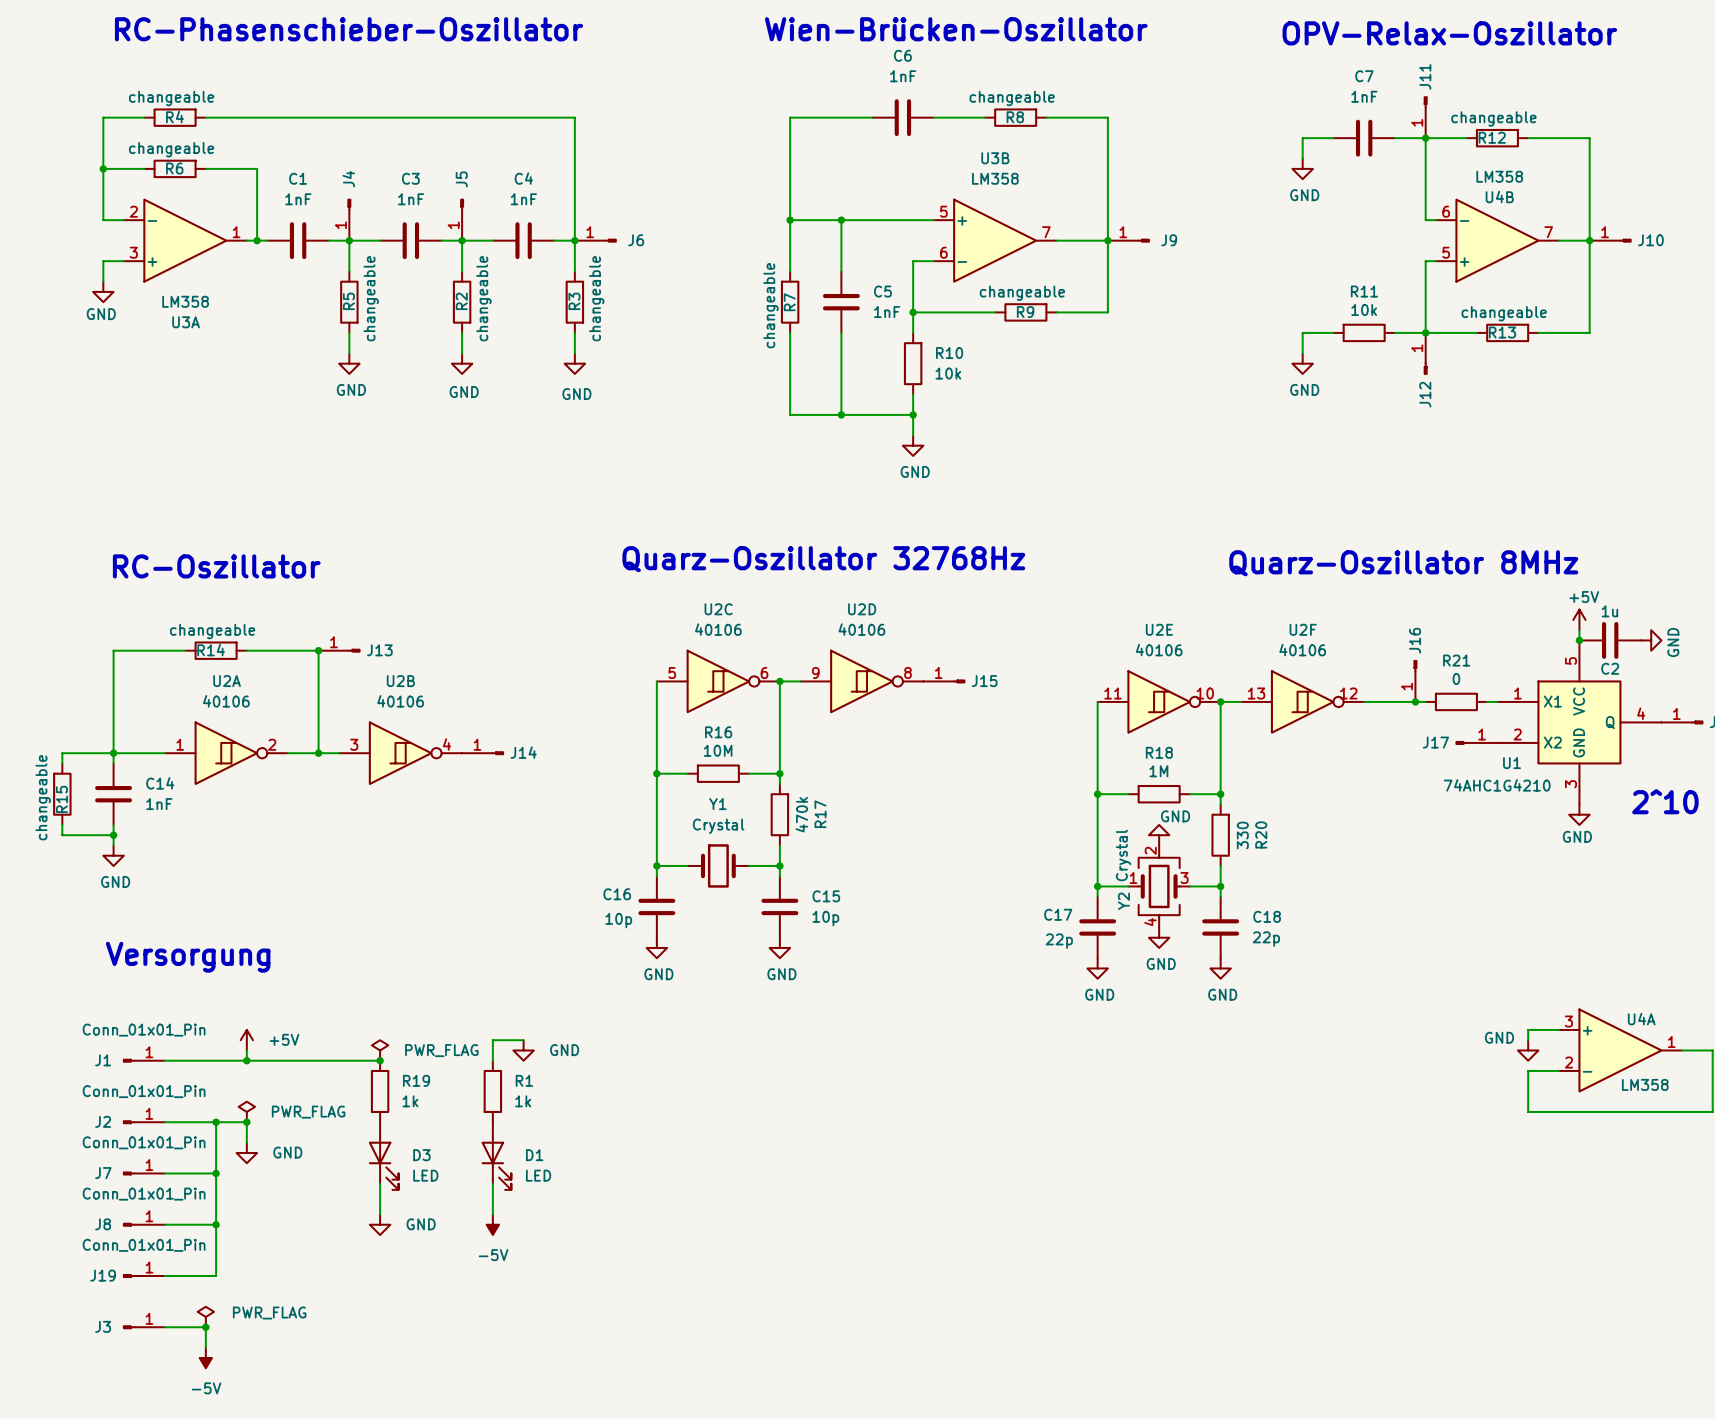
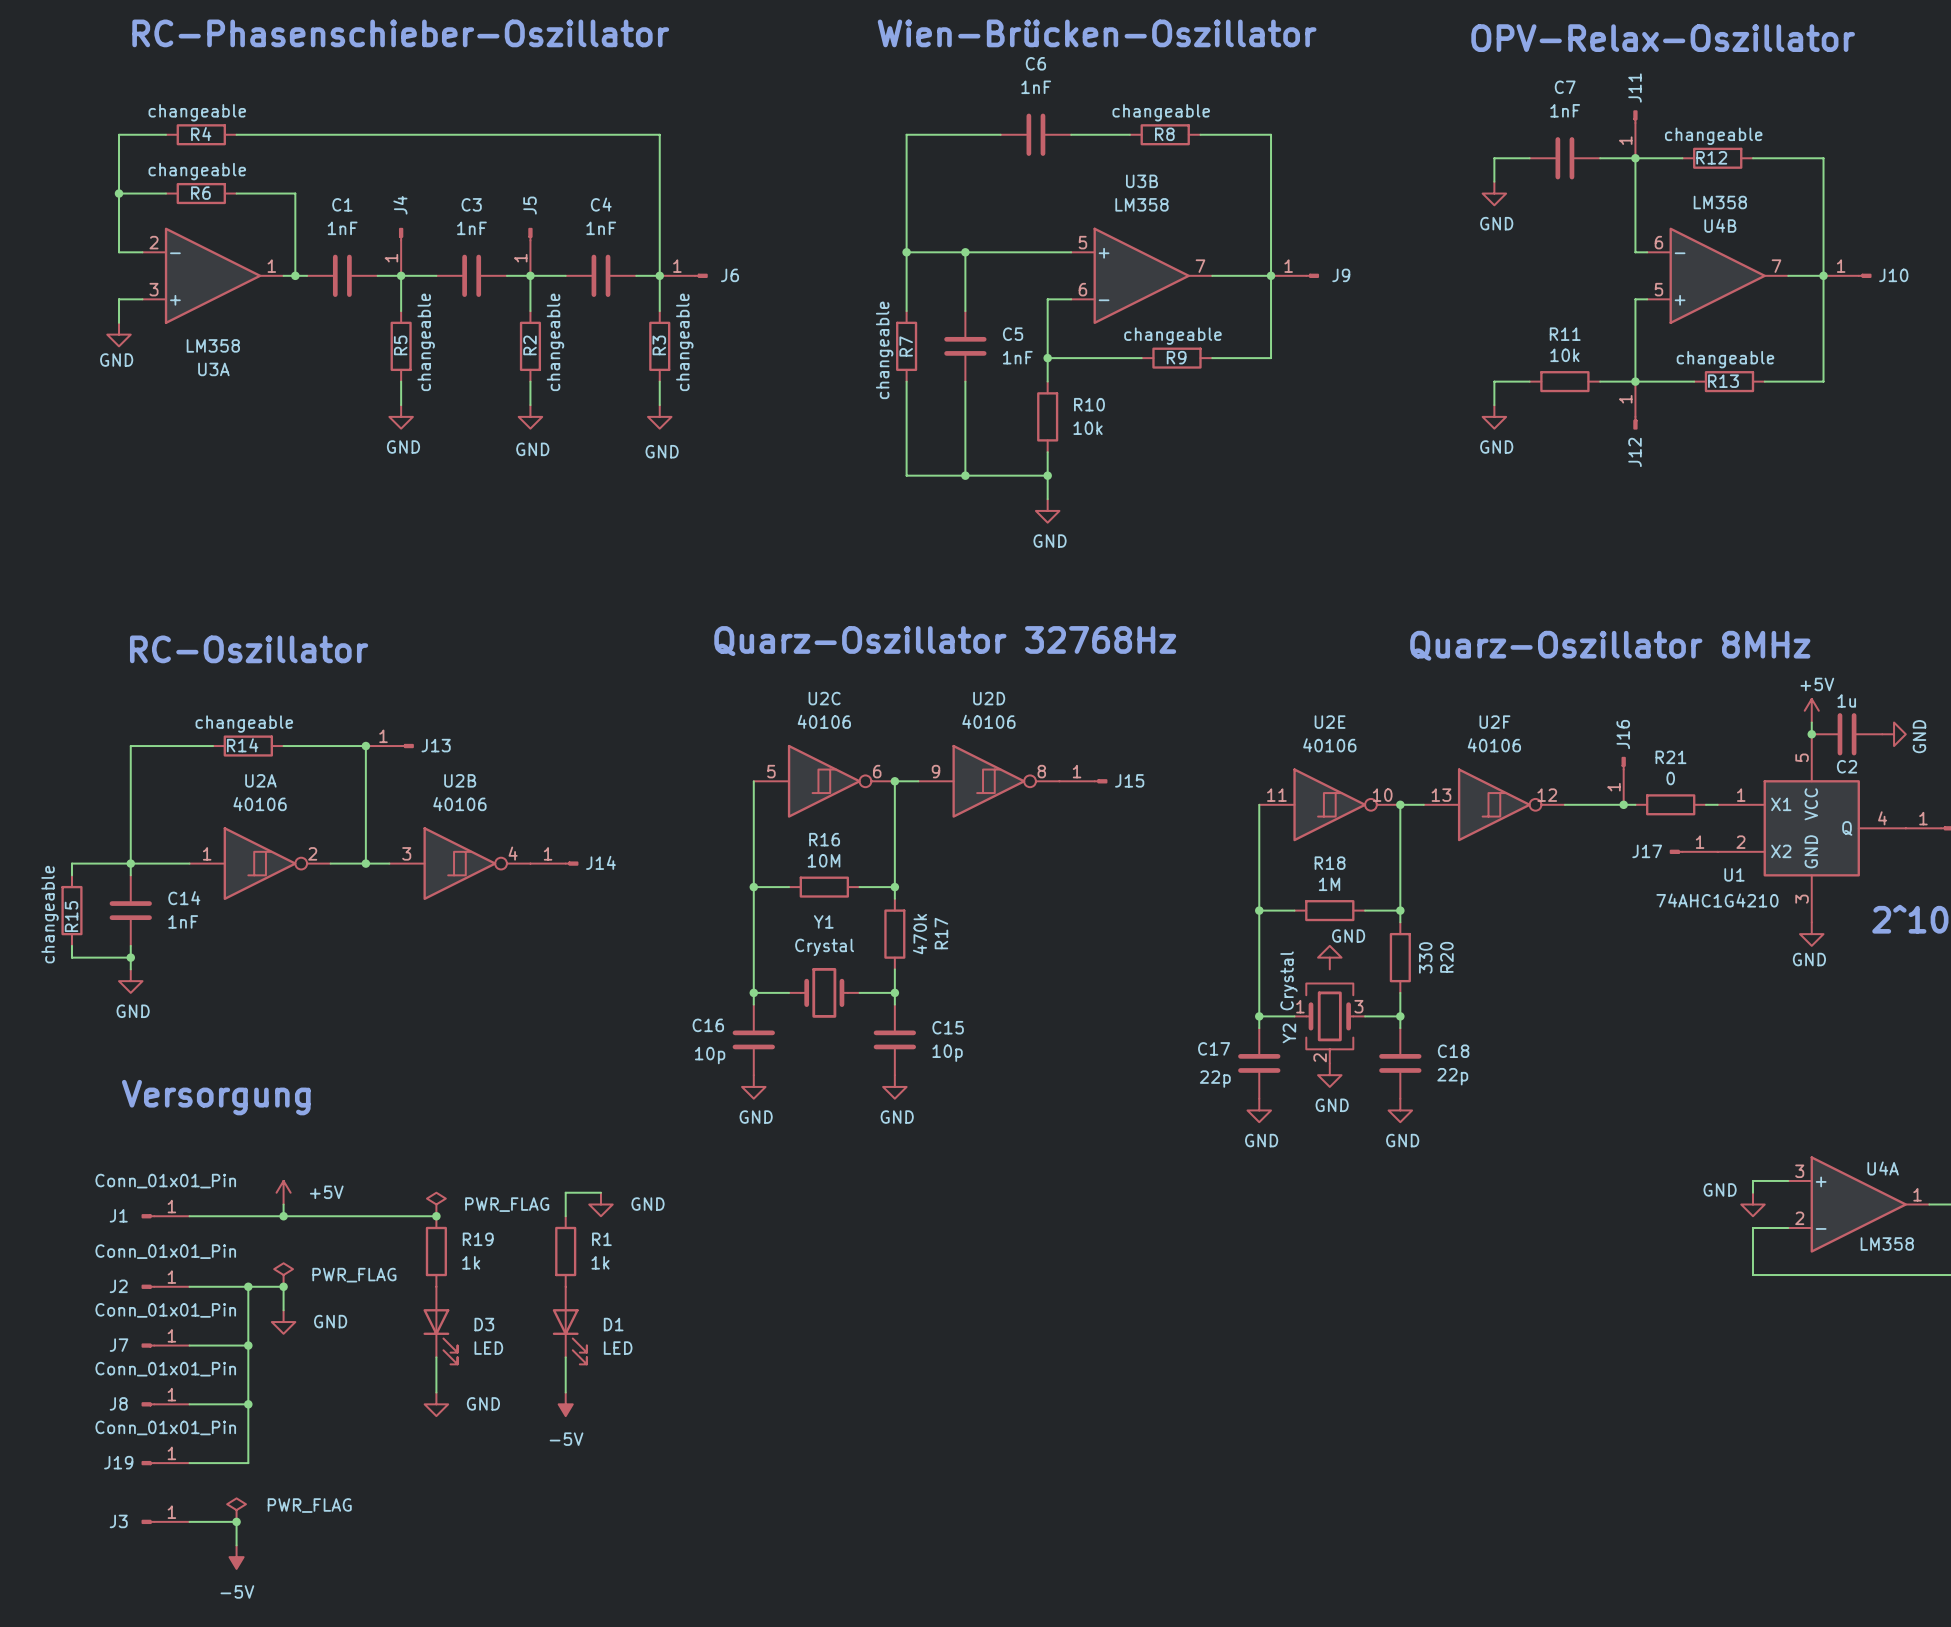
Y2 symbol: [1128, 845, 1190, 928] -> [1294, 983, 1366, 1064]

